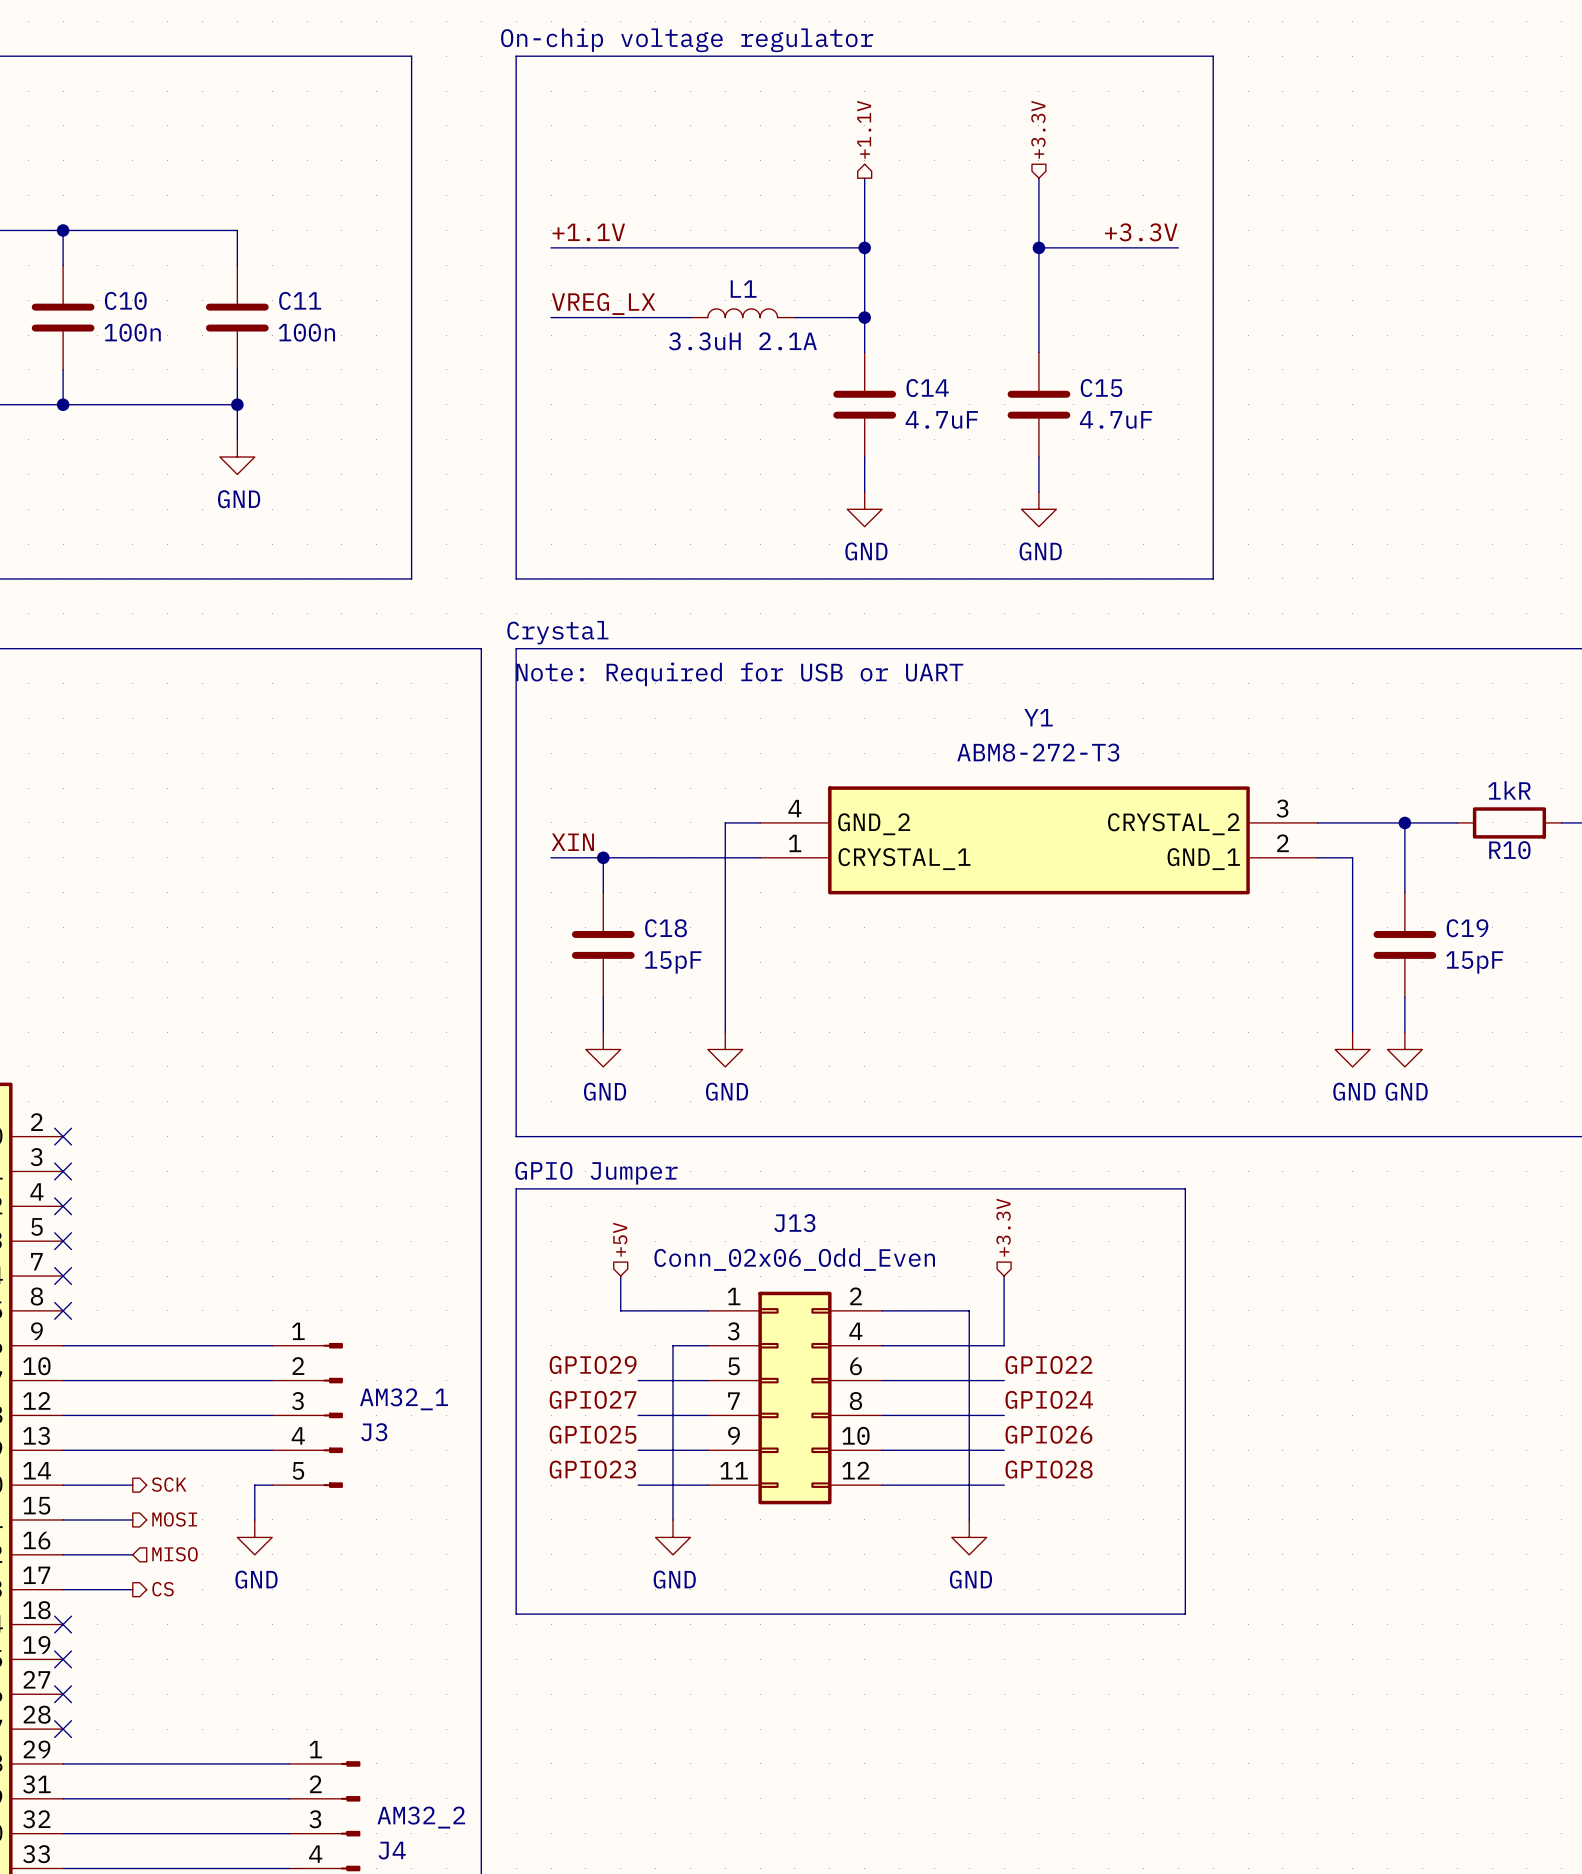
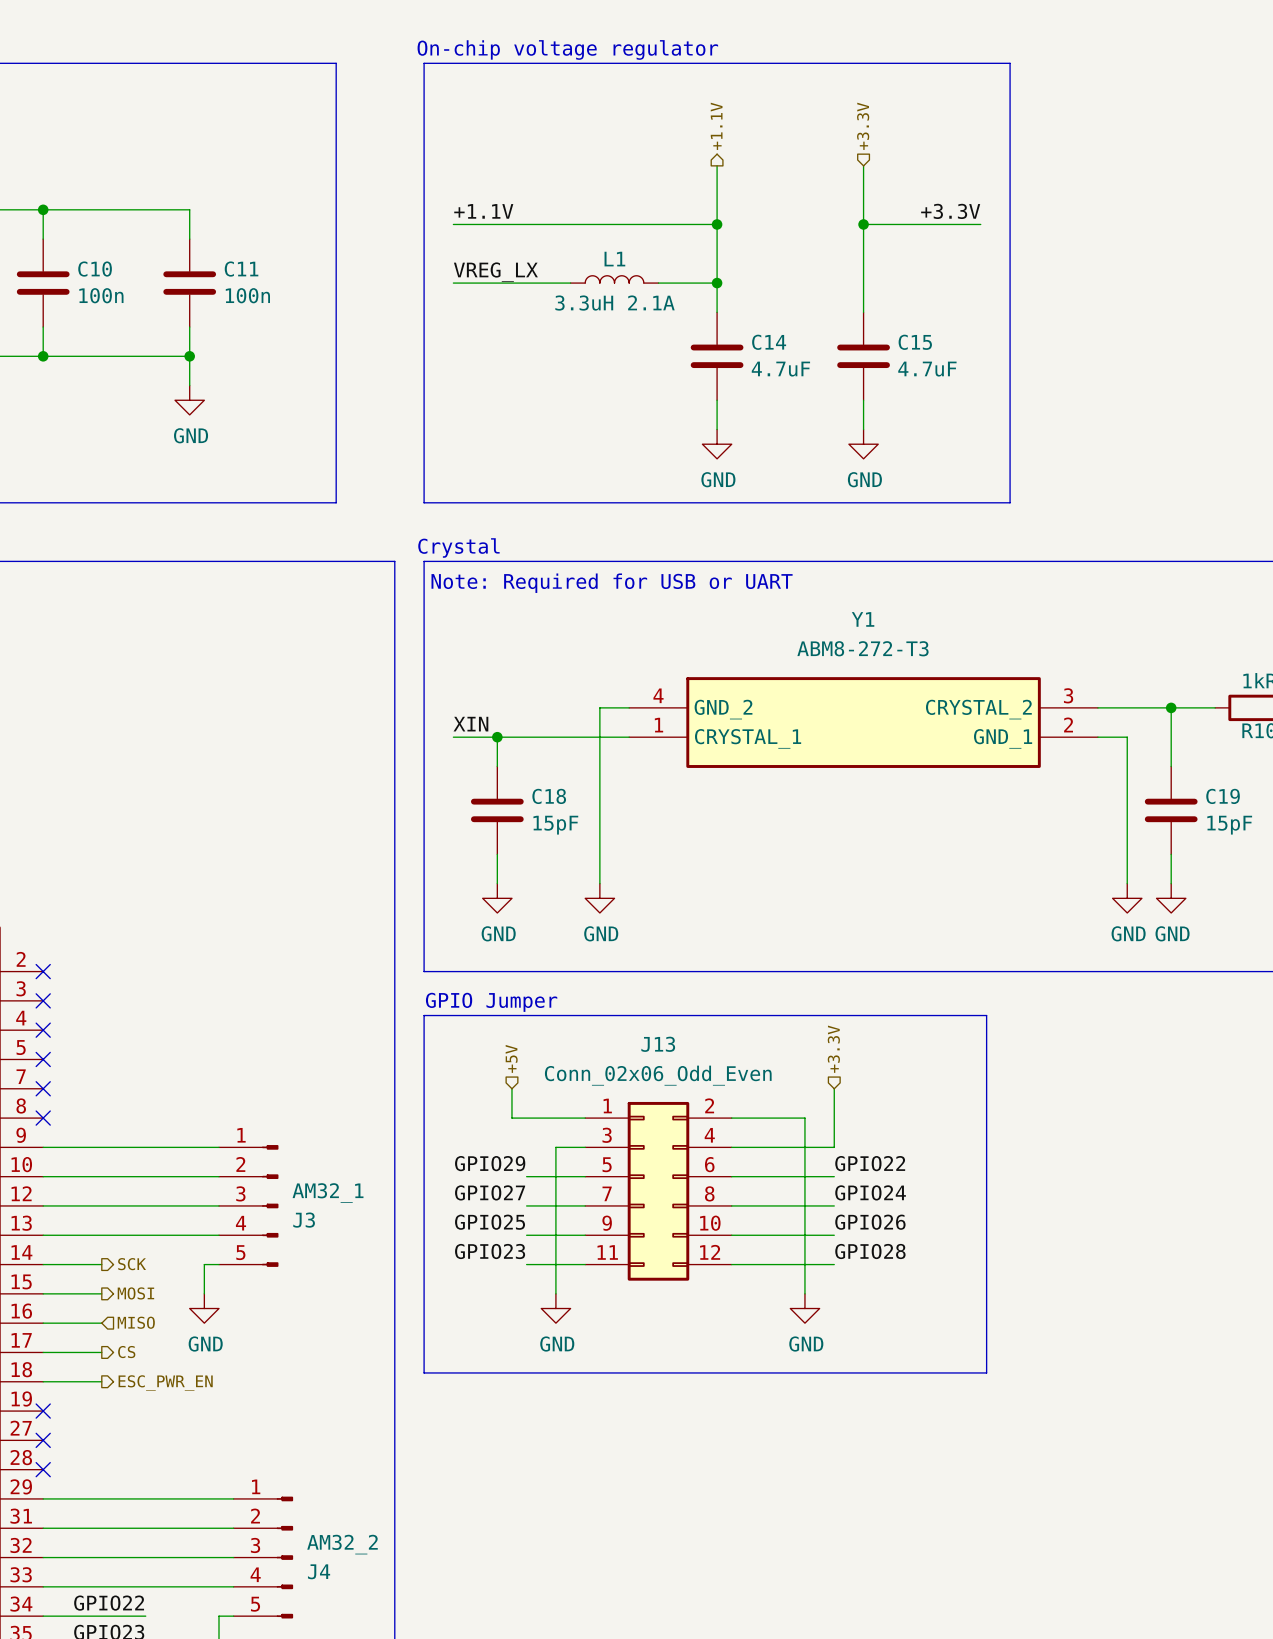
wire: none -> (43, 1381) (101, 1381)
no-connect mark: (63, 1624) -> none
hierarchical label: none -> ESC_PWR_EN (165, 1383)

